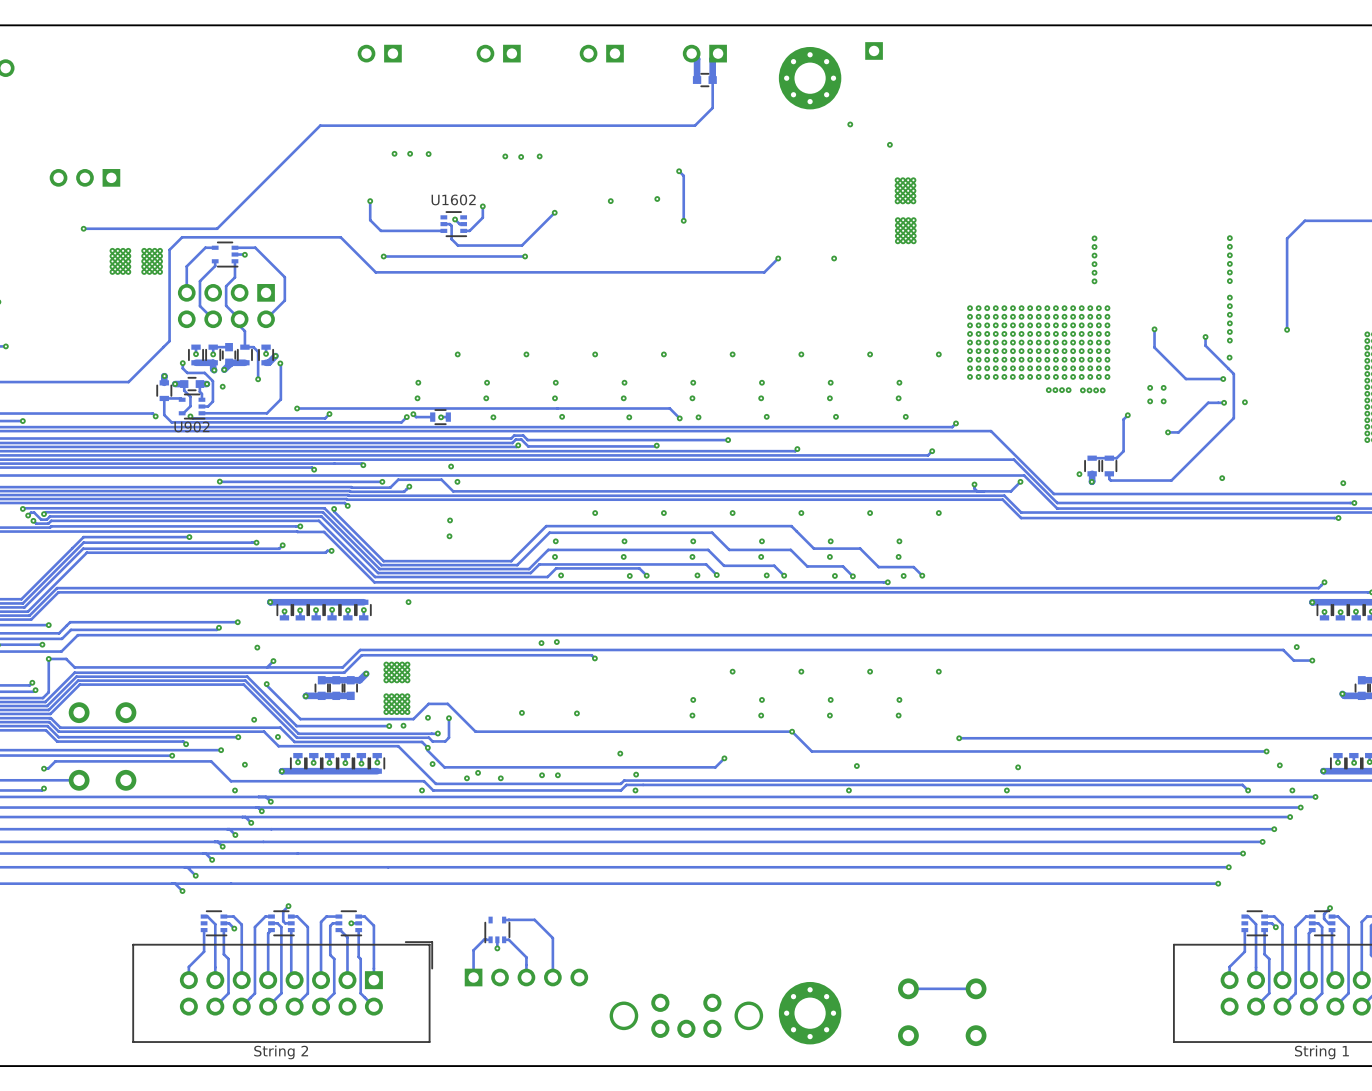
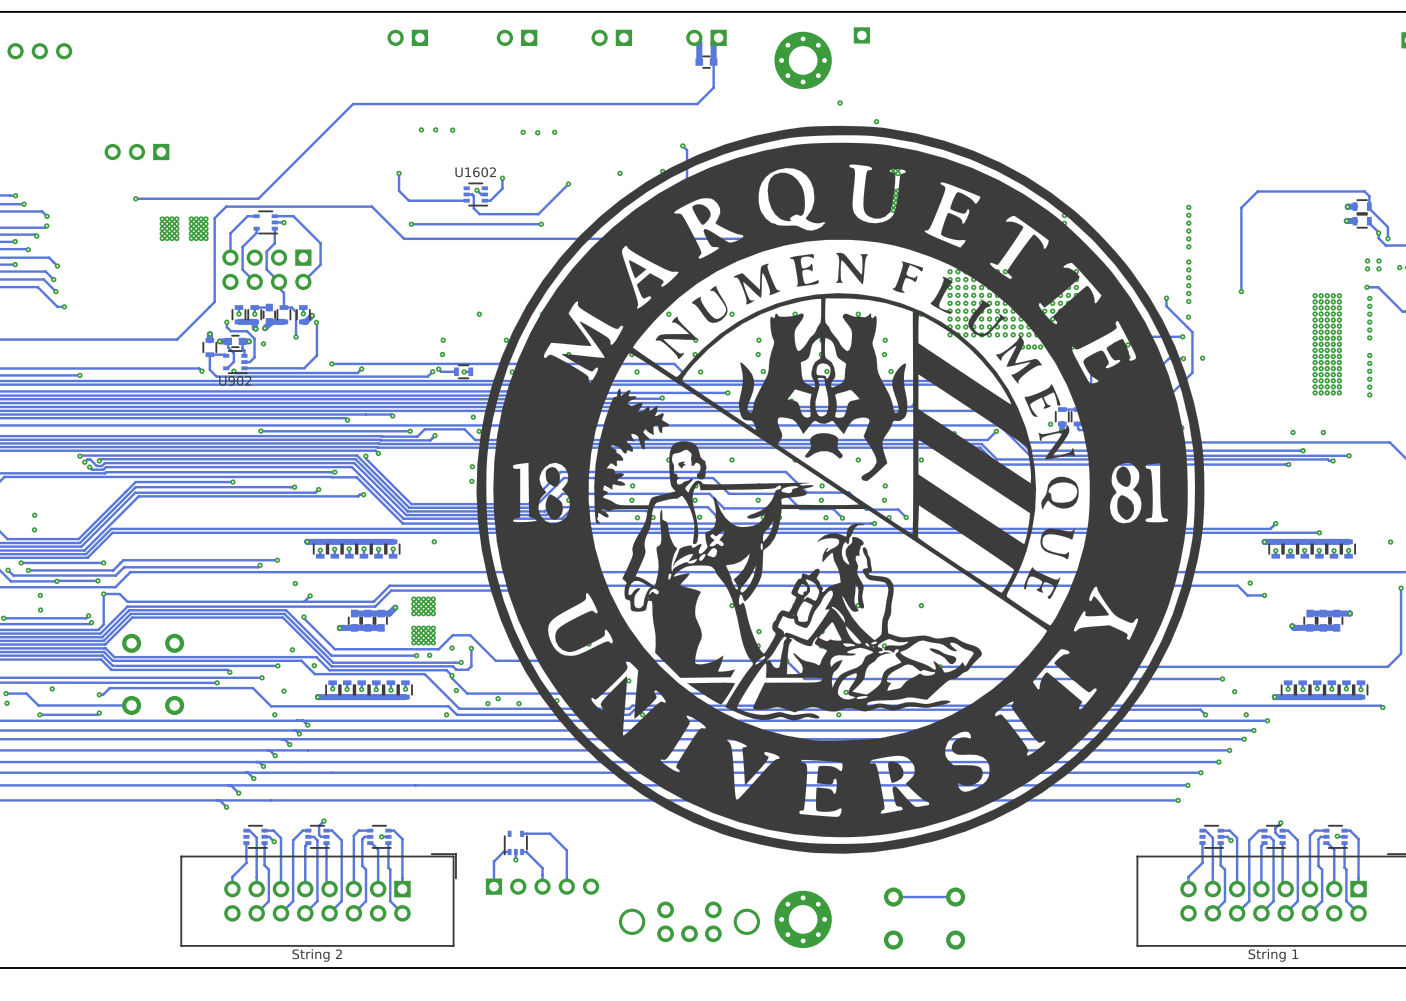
drawing: none -> [476, 125, 1205, 854]

